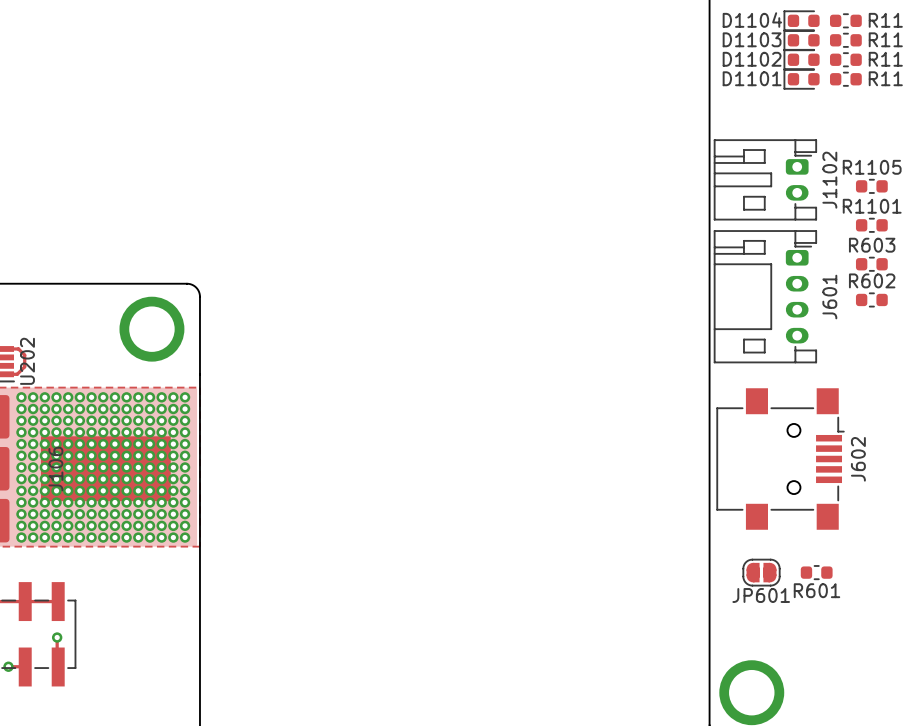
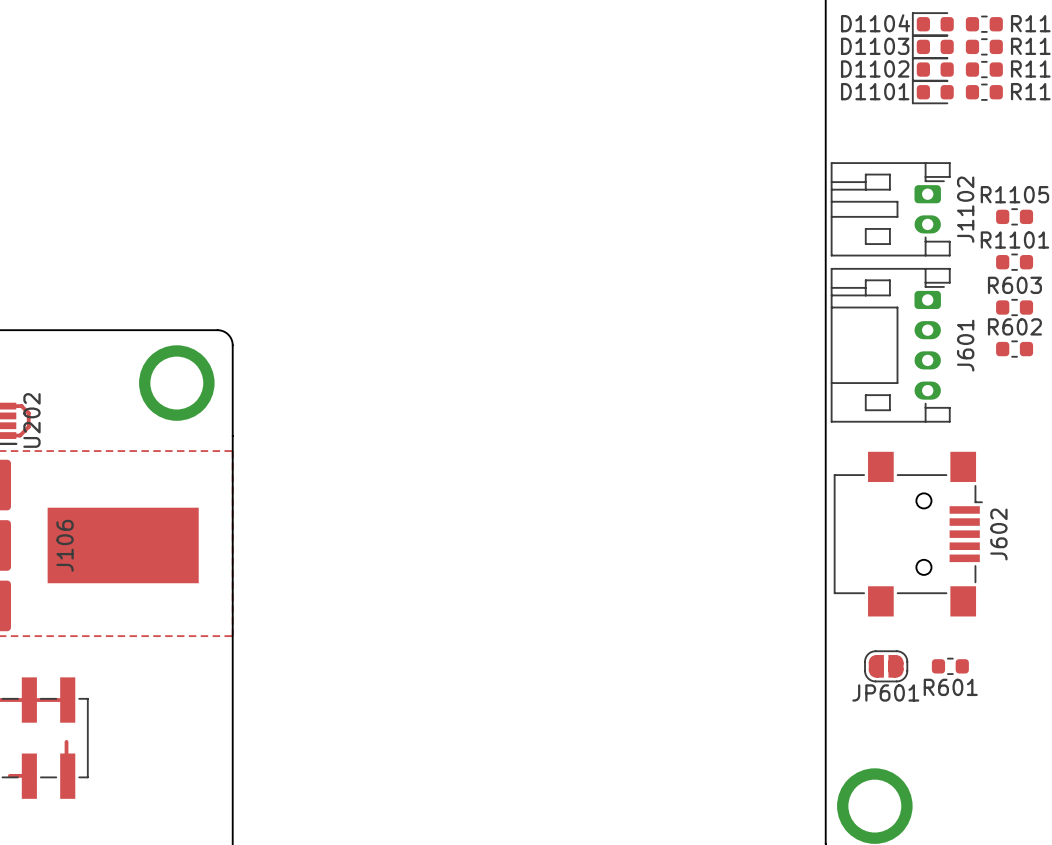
via: (21, 397) -> none
via: (33, 397) -> none
via: (44, 397) -> none
via: (56, 397) -> none
via: (68, 397) -> none
via: (79, 397) -> none
via: (91, 397) -> none
via: (103, 397) -> none
via: (114, 397) -> none
via: (126, 397) -> none
via: (138, 397) -> none
via: (149, 397) -> none
via: (161, 397) -> none
via: (173, 397) -> none
via: (185, 397) -> none
via: (21, 409) -> none
via: (33, 409) -> none
via: (44, 409) -> none
via: (56, 409) -> none
via: (68, 409) -> none
via: (79, 409) -> none
via: (91, 409) -> none
via: (103, 409) -> none
via: (114, 409) -> none
via: (126, 409) -> none
via: (138, 409) -> none
via: (149, 409) -> none
via: (161, 409) -> none
via: (173, 409) -> none
via: (185, 409) -> none
via: (21, 420) -> none
via: (33, 420) -> none
via: (44, 420) -> none
via: (56, 420) -> none
via: (68, 420) -> none
via: (79, 420) -> none
via: (91, 420) -> none
via: (103, 420) -> none
via: (114, 420) -> none
via: (126, 420) -> none
via: (138, 420) -> none
via: (149, 420) -> none
via: (161, 420) -> none
via: (173, 420) -> none
via: (185, 420) -> none
via: (21, 432) -> none
via: (33, 432) -> none
via: (44, 432) -> none
via: (56, 432) -> none
via: (68, 432) -> none
via: (79, 432) -> none
via: (91, 432) -> none
via: (103, 432) -> none
via: (114, 432) -> none
via: (126, 432) -> none
via: (138, 432) -> none
via: (149, 432) -> none
via: (161, 432) -> none
via: (173, 432) -> none
via: (185, 432) -> none
via: (21, 444) -> none
via: (33, 444) -> none
via: (44, 444) -> none
via: (56, 444) -> none
via: (68, 444) -> none
via: (79, 444) -> none
via: (91, 444) -> none
via: (103, 444) -> none
via: (114, 444) -> none
via: (126, 444) -> none
via: (138, 444) -> none
via: (149, 444) -> none
via: (161, 444) -> none
via: (173, 444) -> none
via: (185, 444) -> none
via: (21, 455) -> none
via: (33, 455) -> none
via: (44, 455) -> none
via: (56, 455) -> none
via: (68, 455) -> none
via: (79, 455) -> none
via: (91, 455) -> none
via: (103, 455) -> none
via: (114, 455) -> none
via: (126, 455) -> none
via: (138, 455) -> none
via: (149, 455) -> none
via: (161, 455) -> none
via: (173, 455) -> none
via: (185, 455) -> none
via: (21, 467) -> none
via: (33, 467) -> none
via: (44, 467) -> none
via: (56, 467) -> none
via: (68, 467) -> none
via: (79, 467) -> none
via: (91, 467) -> none
via: (103, 467) -> none
via: (114, 467) -> none
via: (126, 467) -> none
via: (138, 467) -> none
via: (149, 467) -> none
via: (161, 467) -> none
via: (173, 467) -> none
via: (185, 467) -> none
via: (21, 479) -> none
via: (33, 479) -> none
via: (44, 479) -> none
via: (56, 479) -> none
via: (68, 479) -> none
via: (79, 479) -> none
via: (91, 479) -> none
via: (103, 479) -> none
via: (114, 479) -> none
via: (126, 479) -> none
via: (138, 479) -> none
via: (149, 479) -> none
via: (161, 479) -> none
via: (173, 479) -> none
via: (185, 479) -> none
via: (21, 490) -> none
via: (33, 490) -> none
via: (44, 490) -> none
via: (56, 490) -> none
via: (68, 490) -> none
via: (79, 490) -> none
via: (91, 490) -> none
via: (103, 490) -> none
via: (114, 490) -> none
via: (126, 490) -> none
via: (138, 490) -> none
via: (149, 490) -> none
via: (161, 490) -> none
via: (173, 490) -> none
via: (185, 490) -> none
via: (21, 502) -> none
via: (33, 502) -> none
via: (44, 502) -> none
via: (56, 502) -> none
via: (68, 502) -> none
via: (79, 502) -> none
via: (91, 502) -> none
via: (103, 502) -> none
via: (114, 502) -> none
via: (126, 502) -> none
via: (138, 502) -> none
via: (149, 502) -> none
via: (161, 502) -> none
via: (173, 502) -> none
via: (185, 502) -> none
via: (21, 514) -> none
via: (33, 514) -> none
via: (44, 514) -> none
via: (56, 514) -> none
via: (68, 514) -> none
via: (79, 514) -> none
via: (91, 514) -> none
via: (103, 514) -> none
via: (114, 514) -> none
via: (126, 514) -> none
via: (138, 514) -> none
via: (149, 514) -> none
via: (161, 514) -> none
via: (173, 514) -> none
via: (185, 514) -> none
via: (21, 525) -> none
via: (33, 525) -> none
via: (44, 525) -> none
via: (56, 525) -> none
via: (68, 525) -> none
via: (79, 525) -> none
via: (91, 525) -> none
via: (103, 525) -> none
via: (114, 525) -> none
via: (126, 525) -> none
via: (138, 525) -> none
via: (149, 525) -> none
via: (161, 525) -> none
via: (173, 525) -> none
via: (185, 525) -> none
via: (21, 537) -> none
via: (33, 537) -> none
via: (44, 537) -> none
via: (56, 537) -> none
via: (68, 537) -> none
via: (79, 537) -> none
via: (91, 537) -> none
via: (103, 537) -> none
via: (114, 537) -> none
via: (126, 537) -> none
via: (138, 537) -> none
via: (149, 537) -> none
via: (161, 537) -> none
via: (173, 537) -> none
via: (185, 537) -> none
via: (57, 637) -> none
via: (8, 666) -> none

